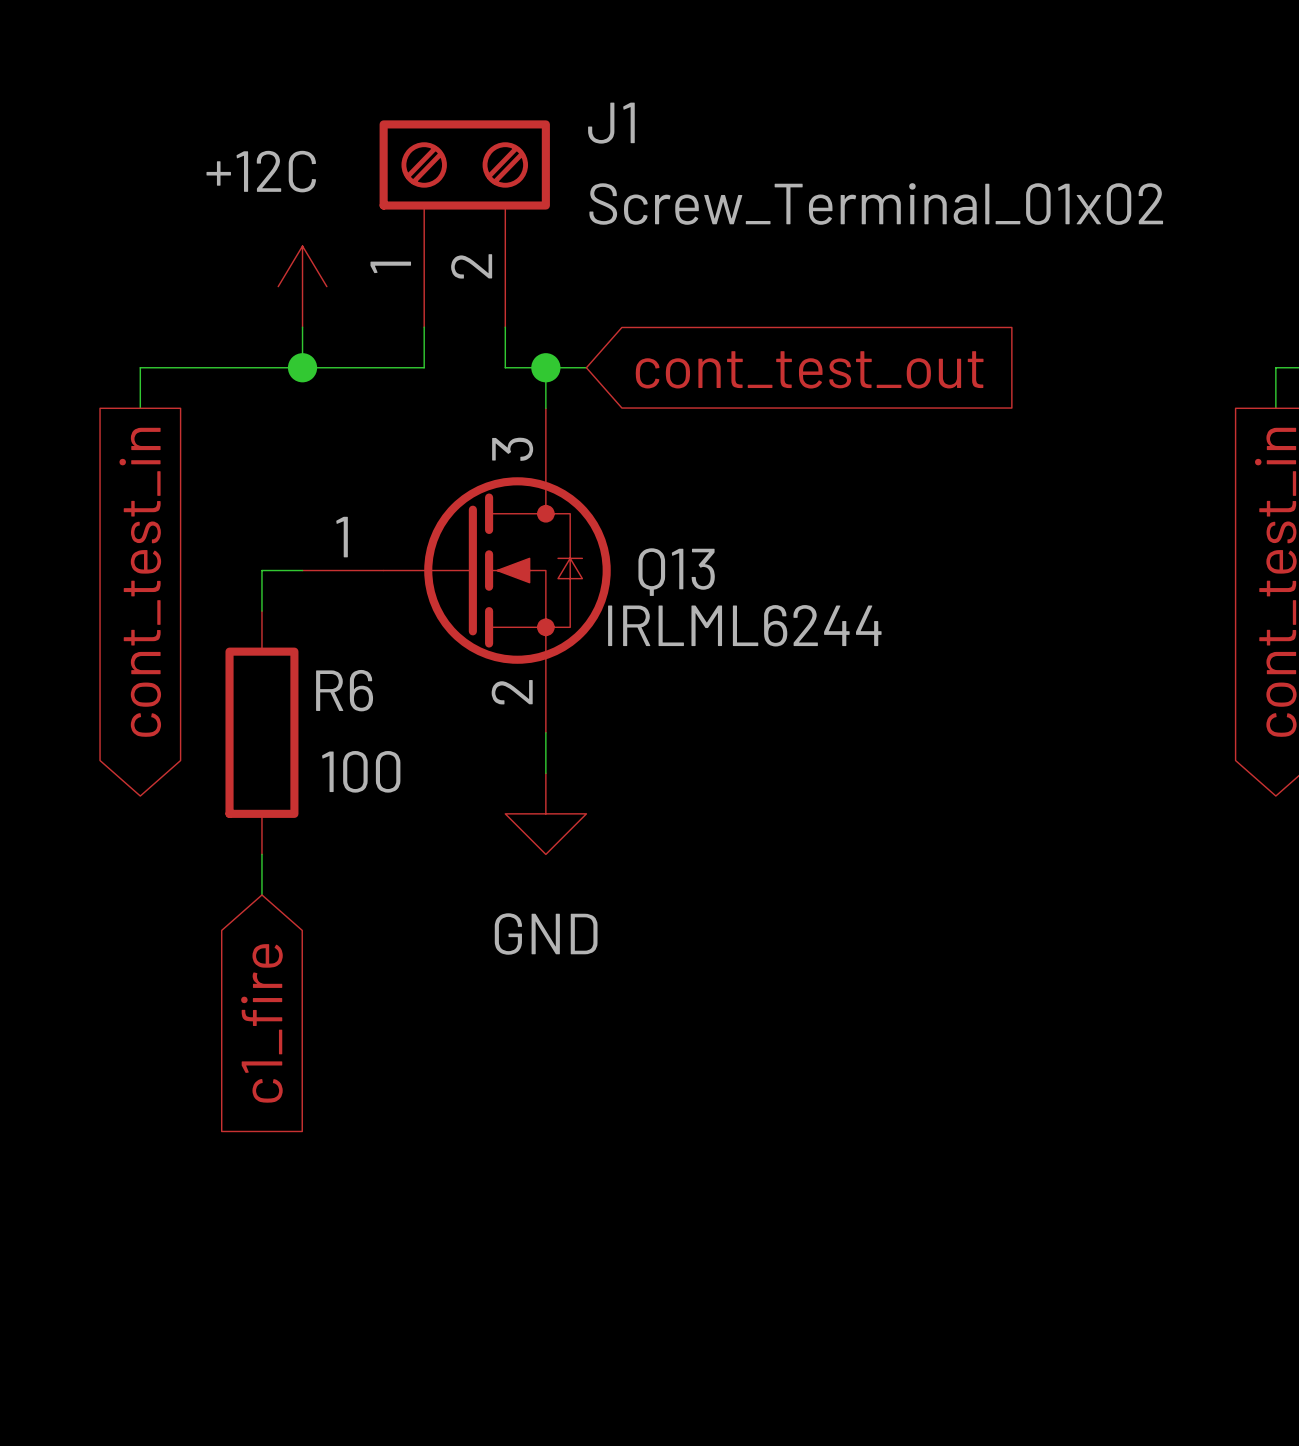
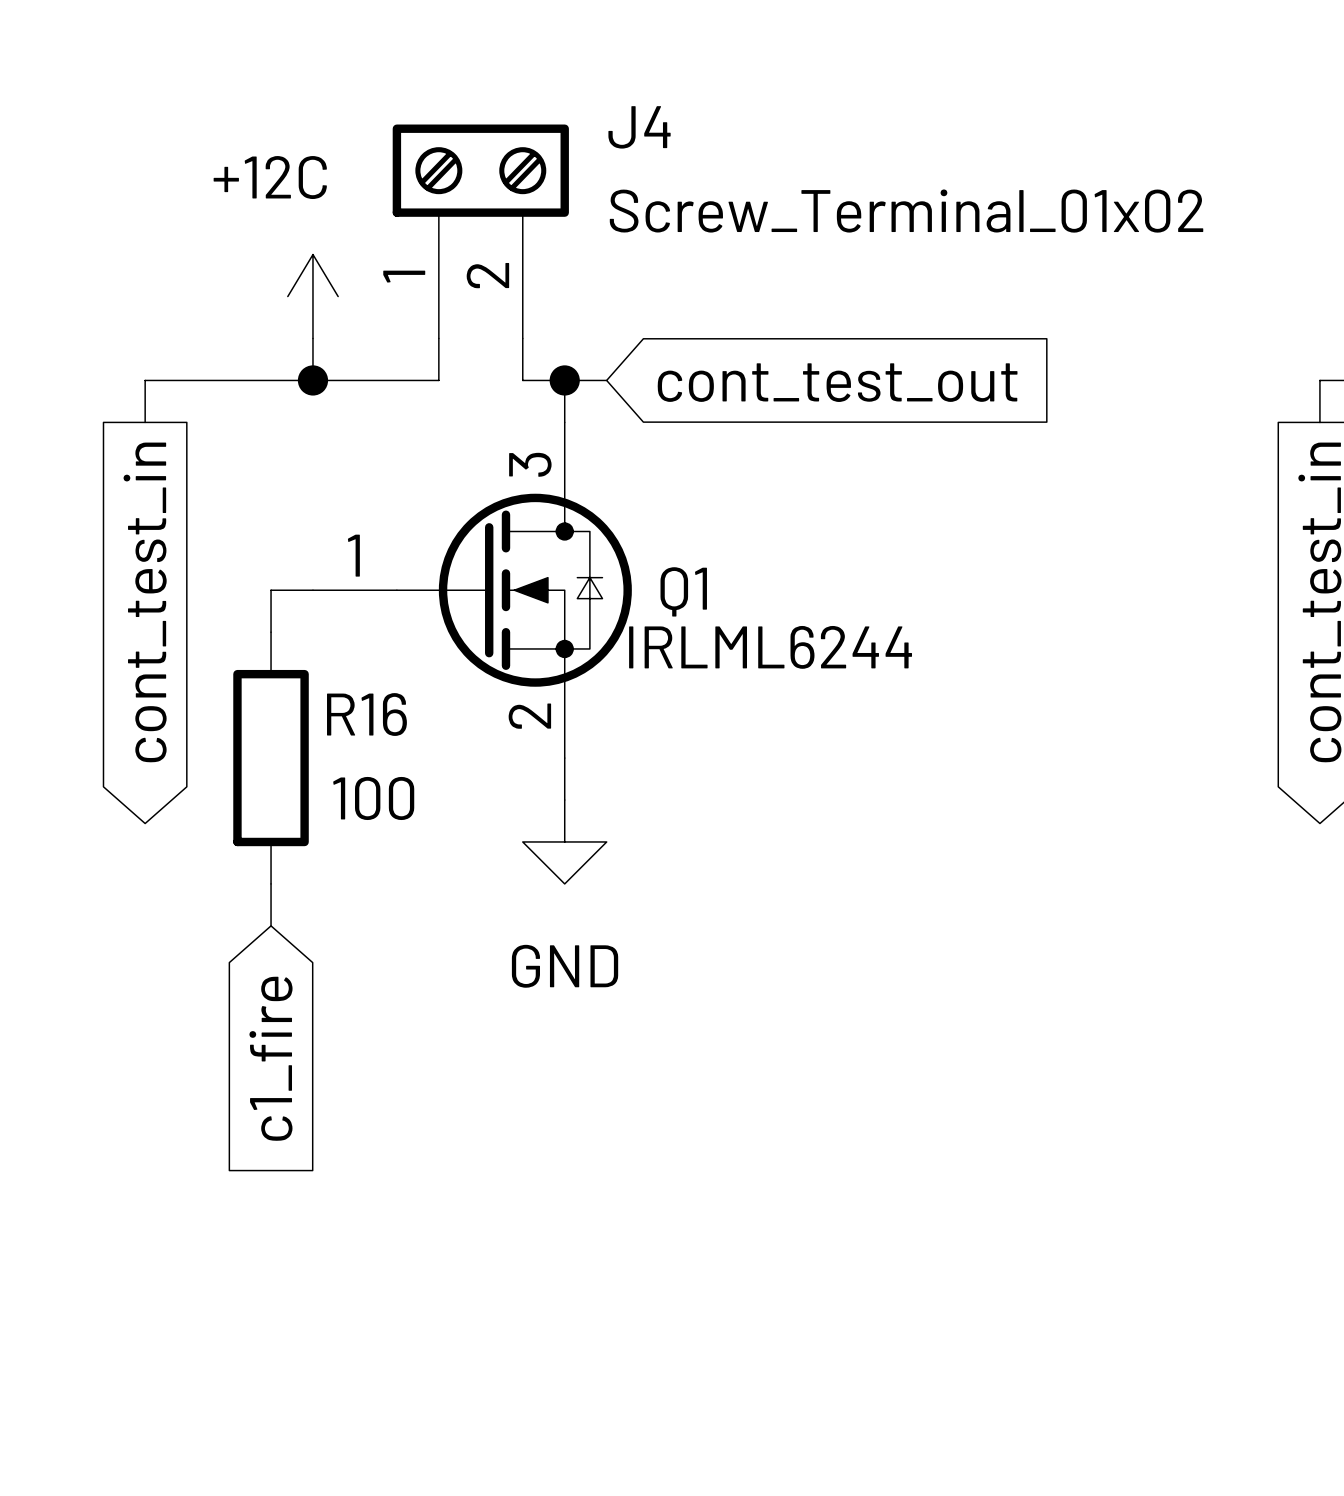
J1 name: J1 (611, 123) -> J4 (639, 127)
Q13 name: Q13 (676, 572) -> Q1 (683, 591)
R6 name: R6 (344, 690) -> R16 (366, 714)

